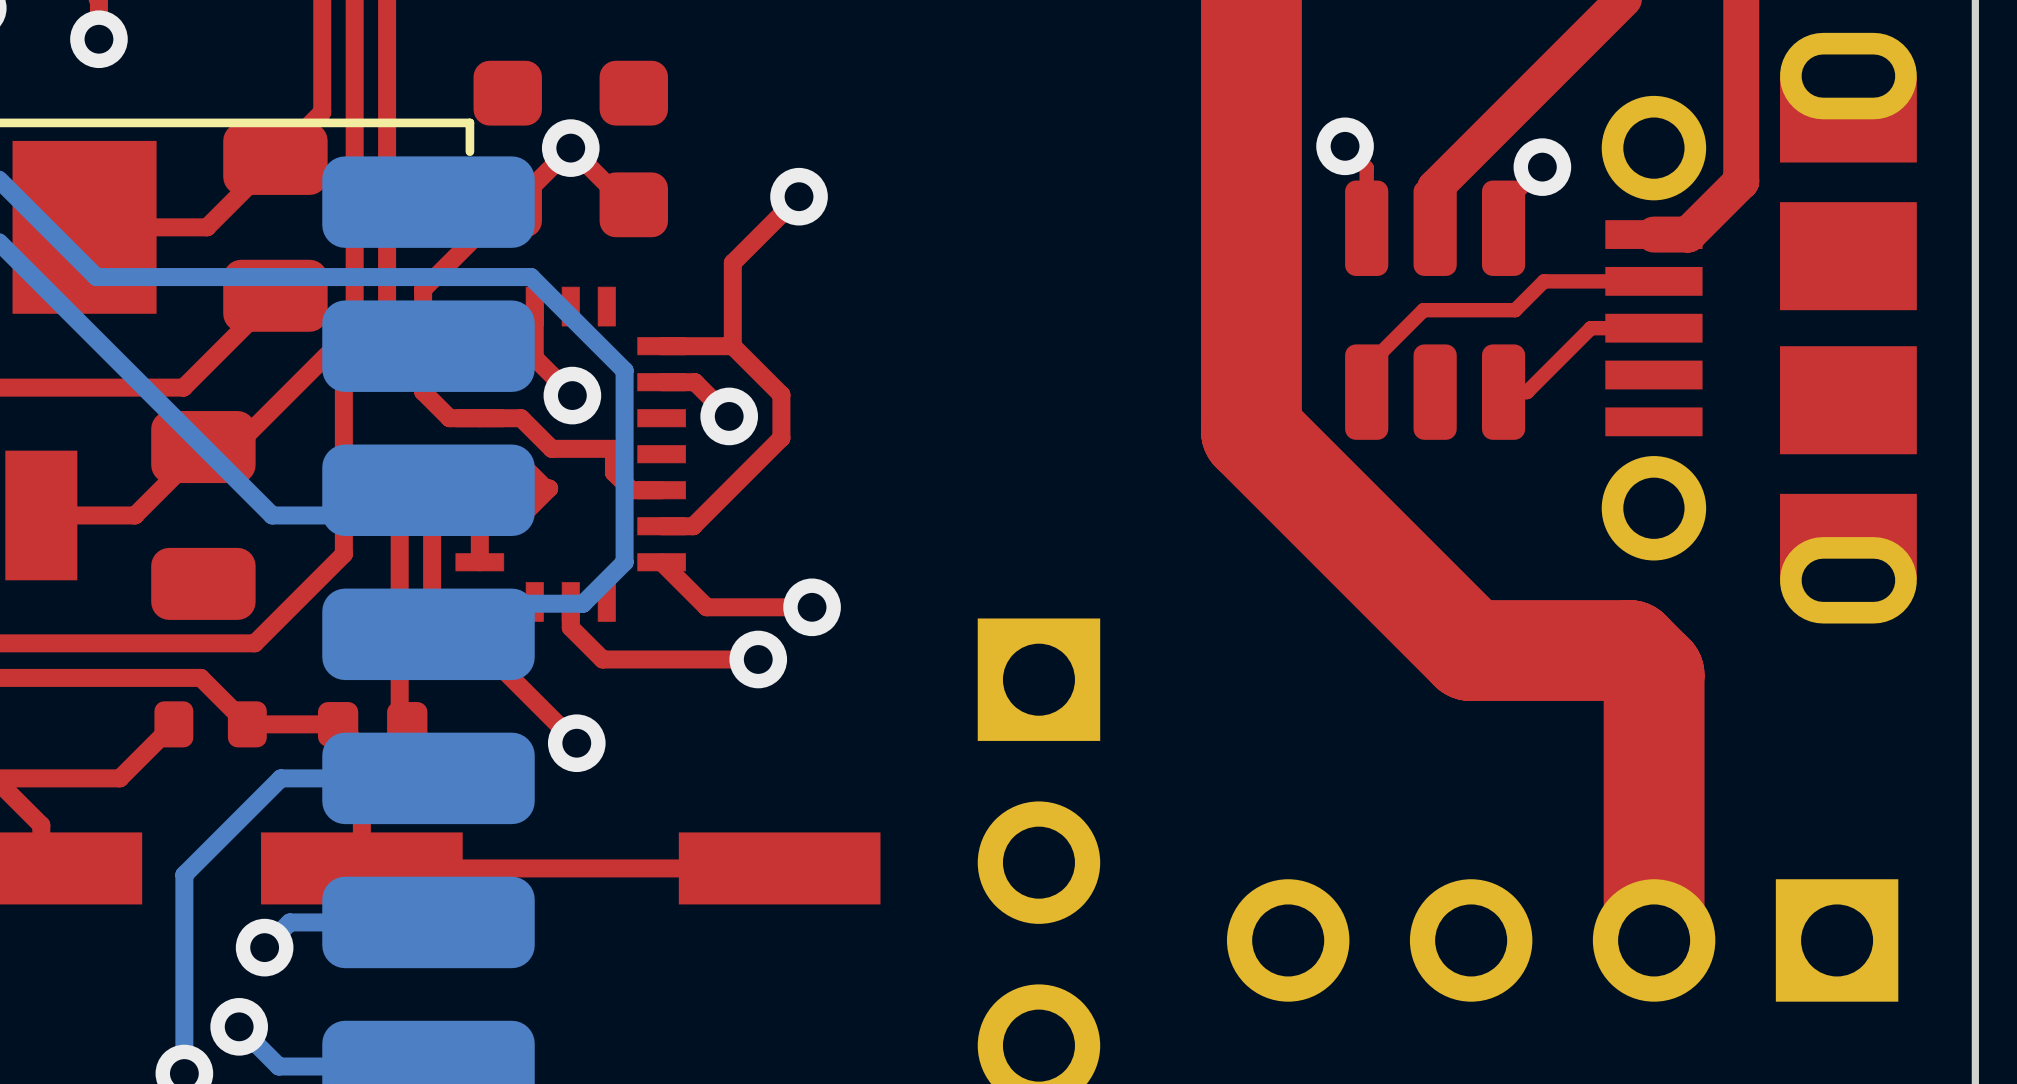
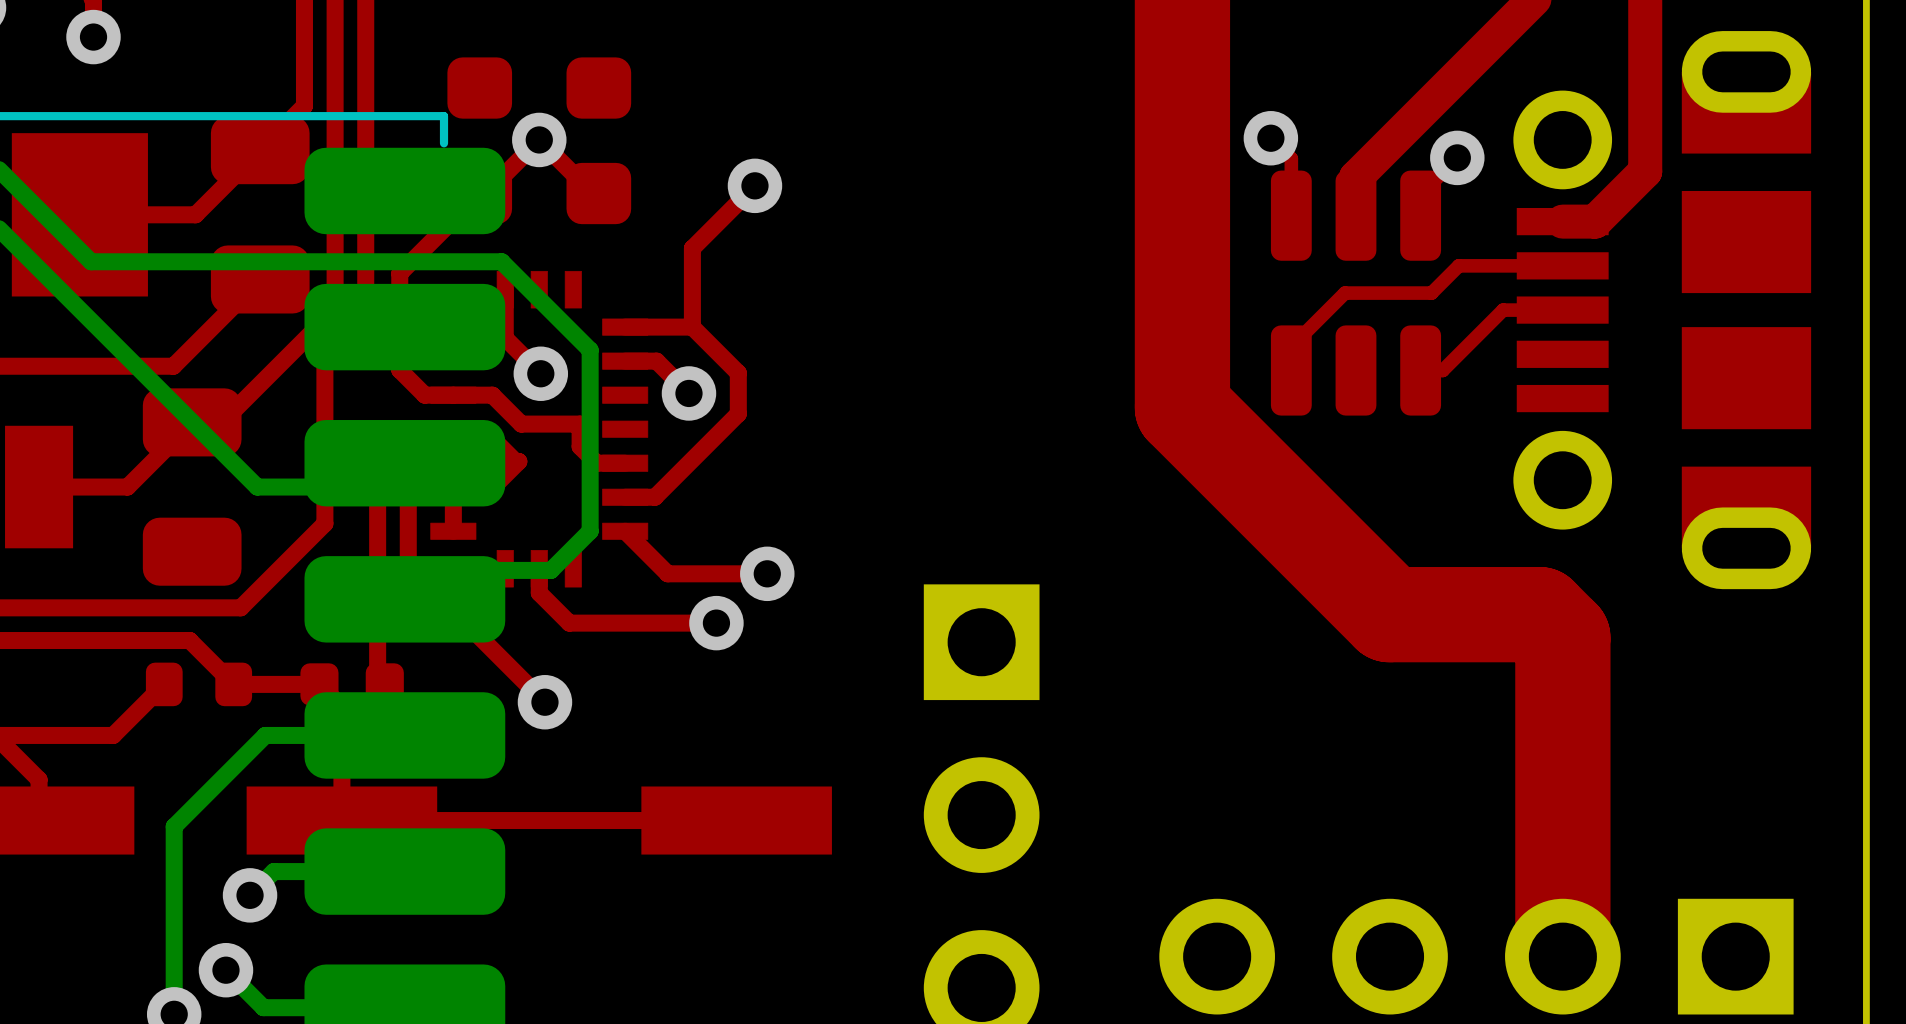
part: (1562, 940) -> none
part: none -> (1476, 956)

